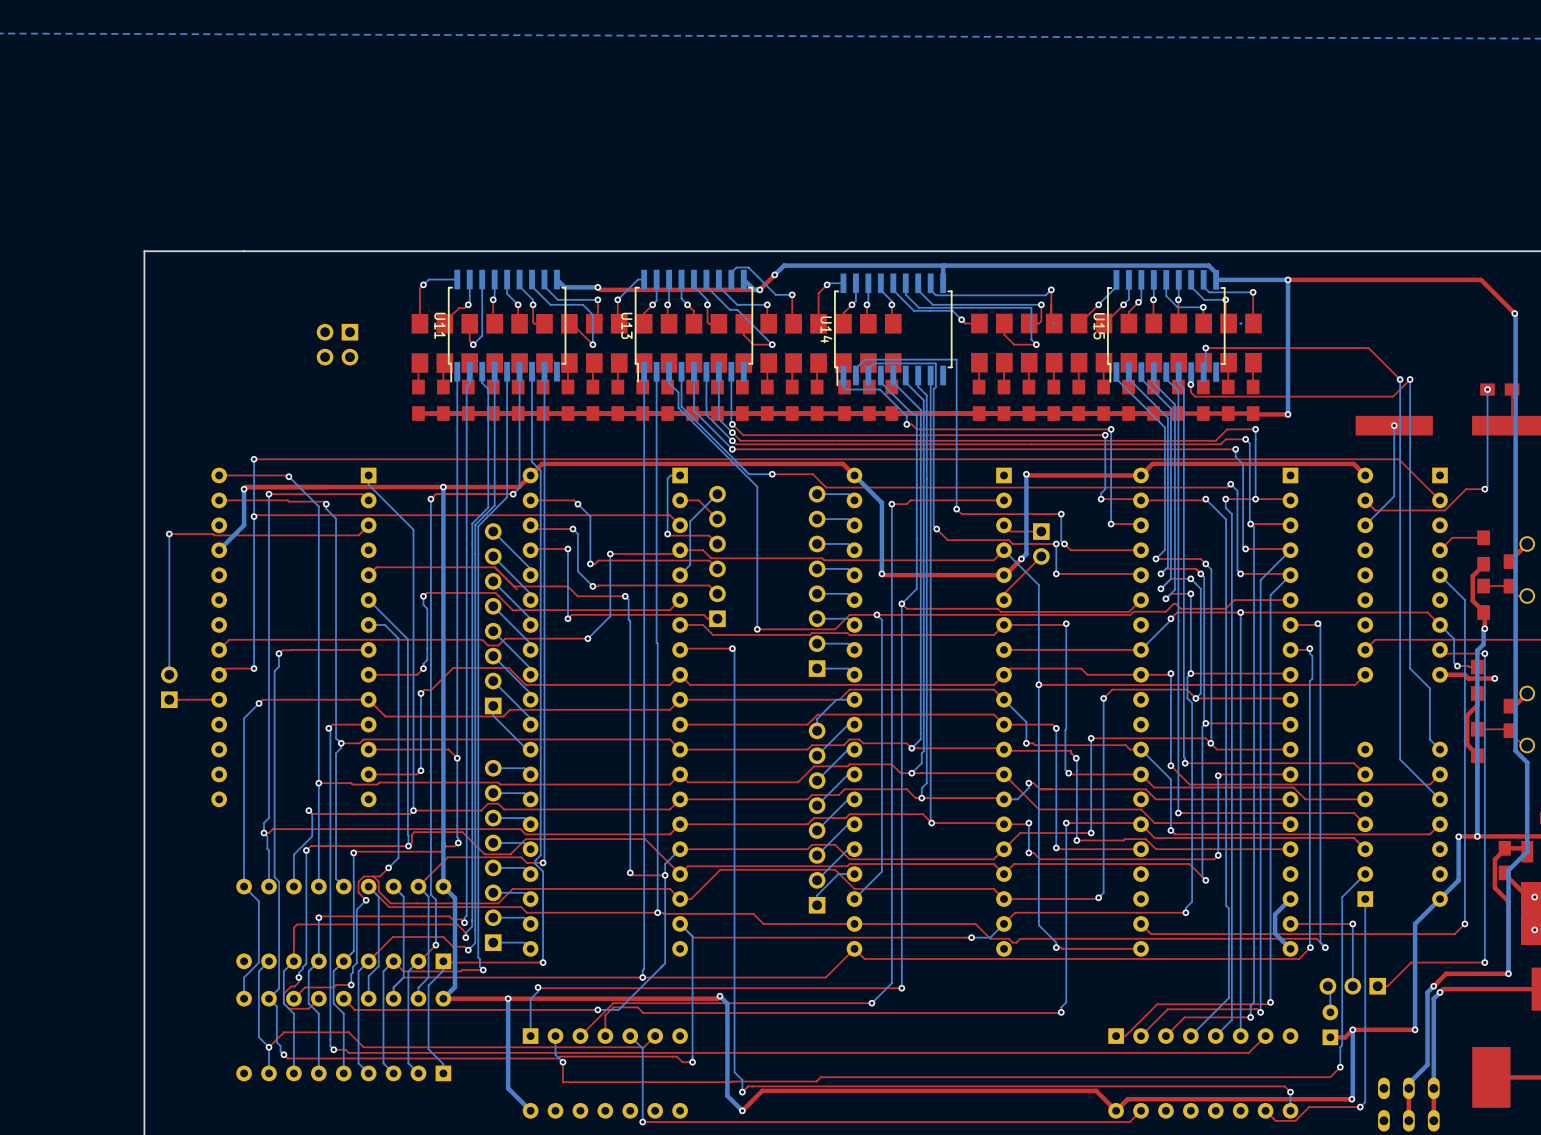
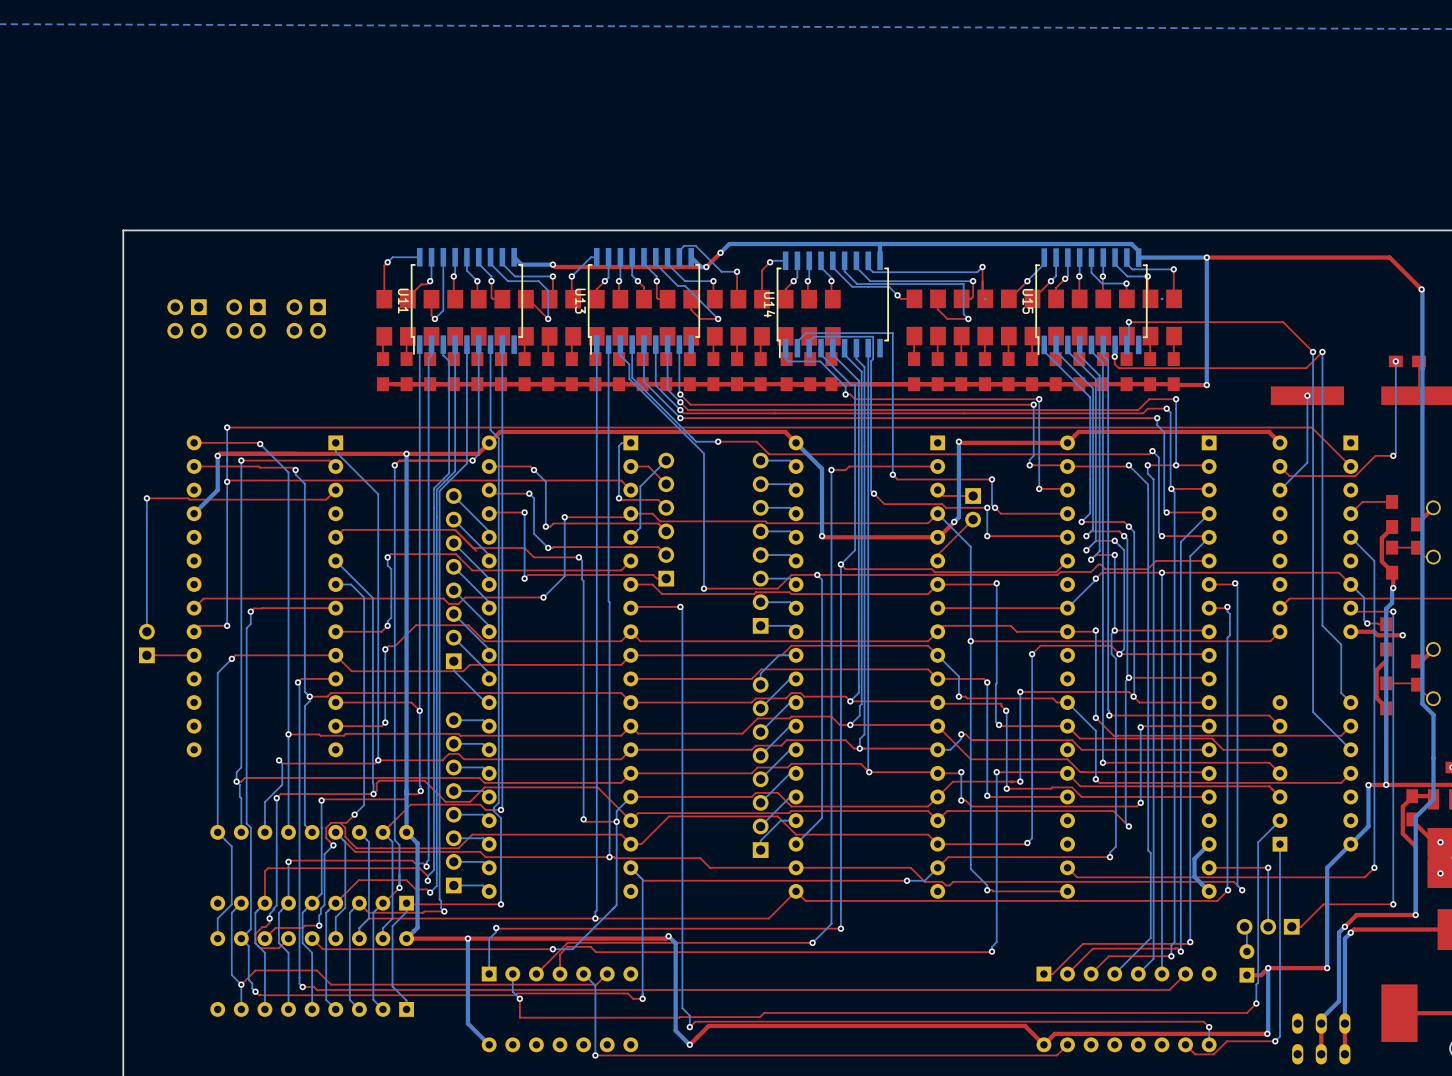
part: none -> (187, 318)
part: none -> (246, 318)

